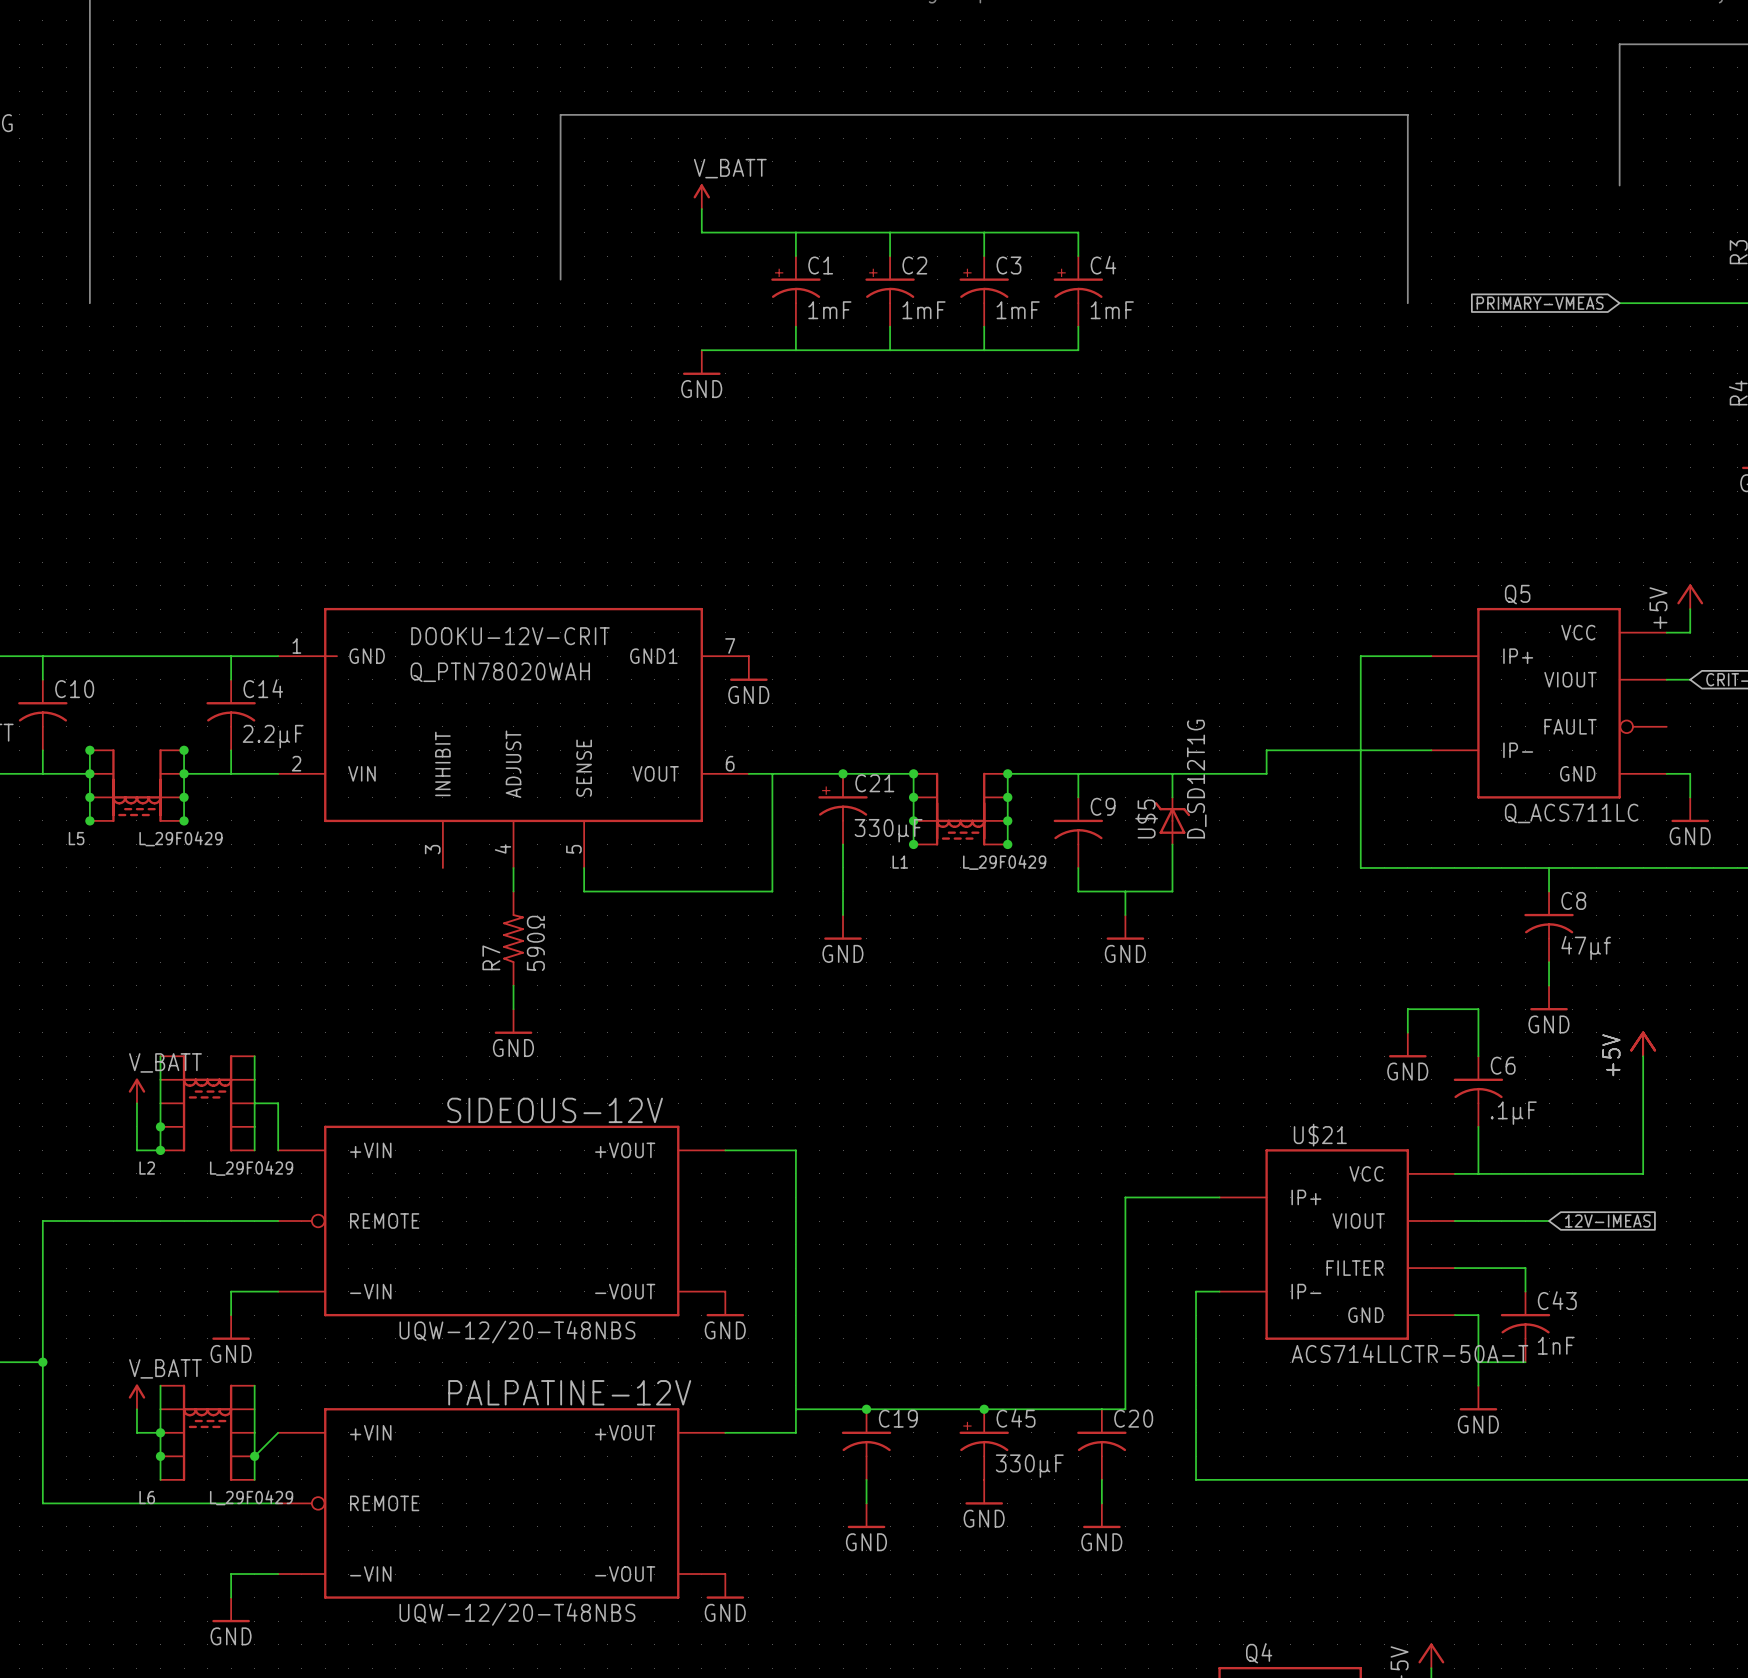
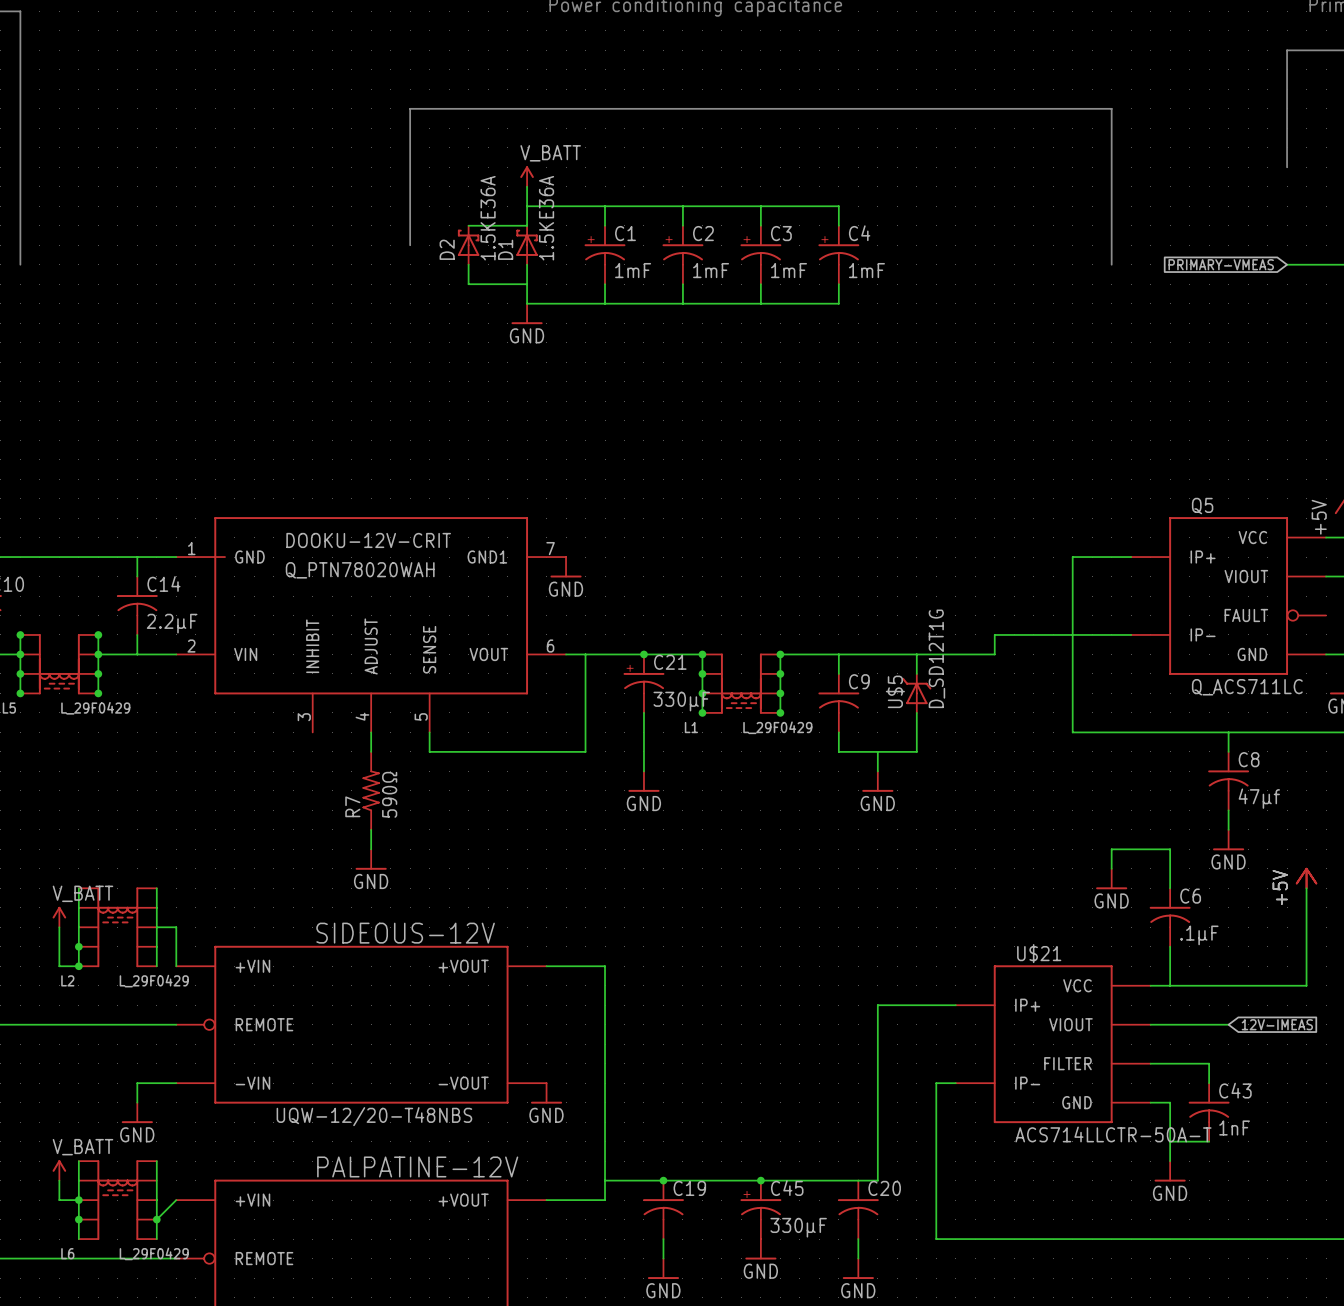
wire: none -> (527, 206) (527, 225) (468, 225)
D2: none -> 1.5KE36A (468, 245)
D1: none -> 1.5KE36A (527, 245)
wire: none -> (468, 264) (468, 284) (527, 284)
wire: none -> (527, 264) (527, 303)

